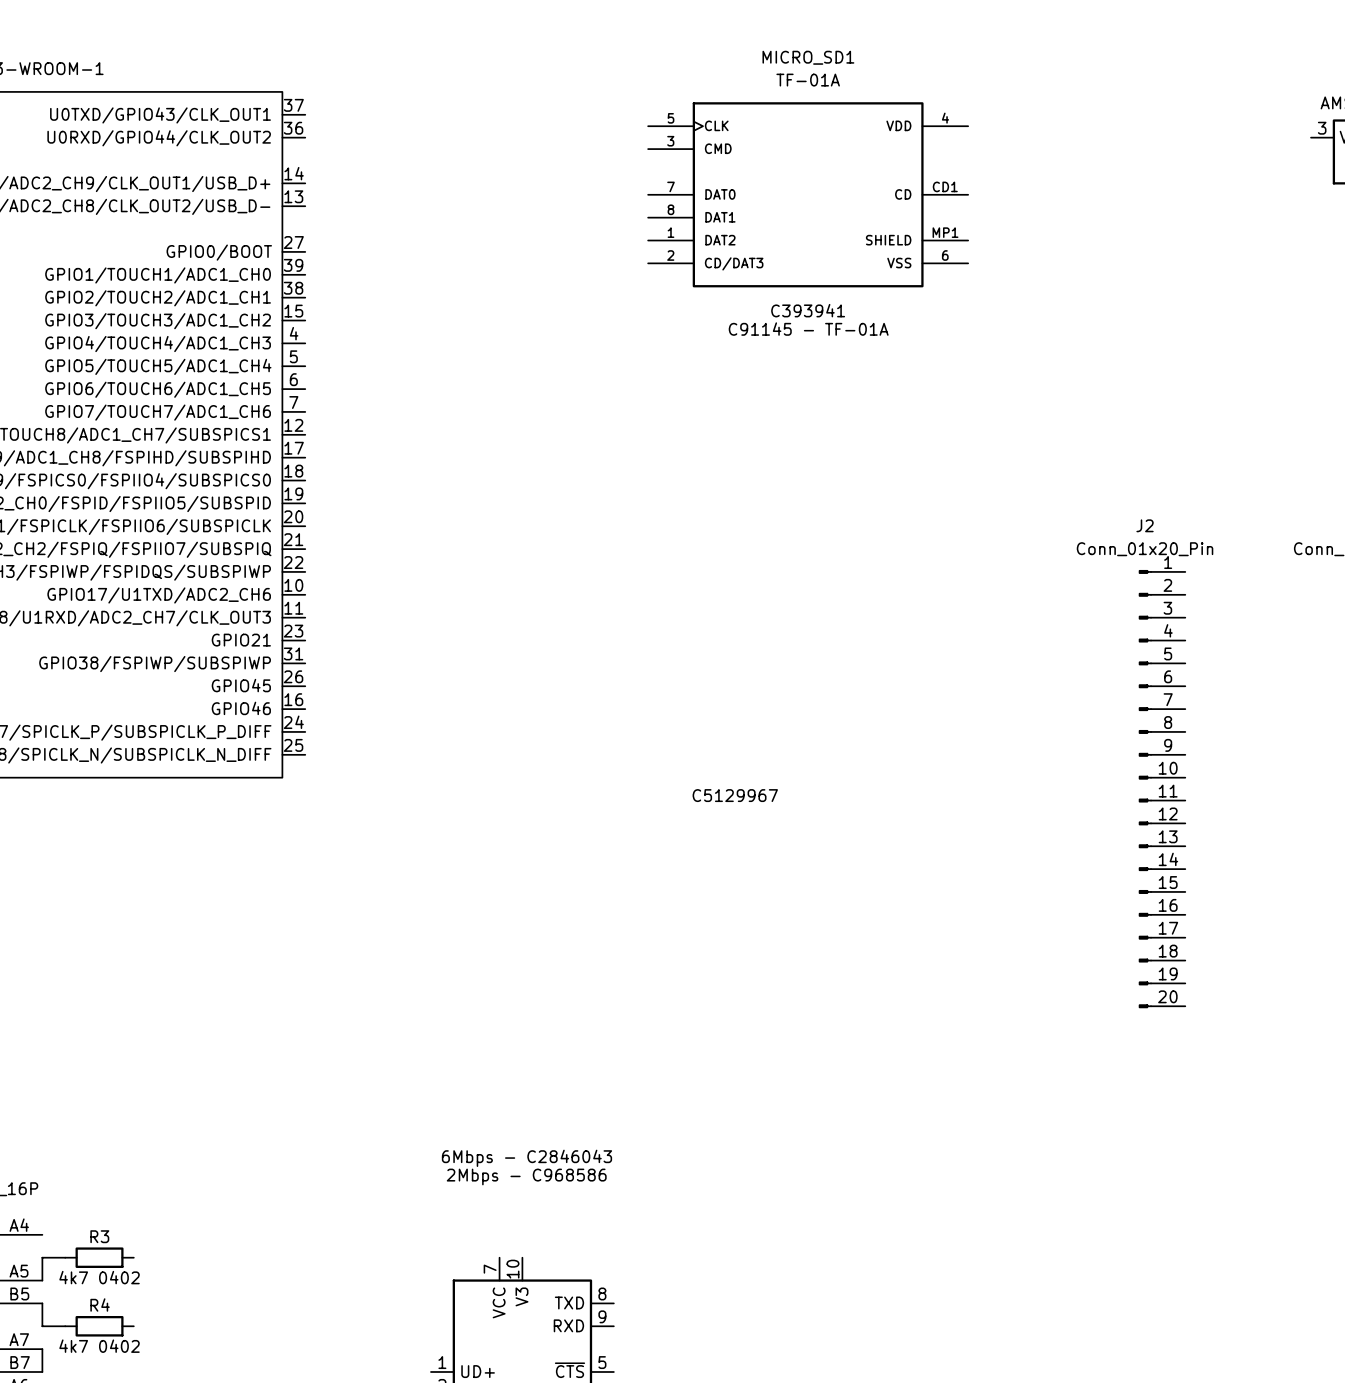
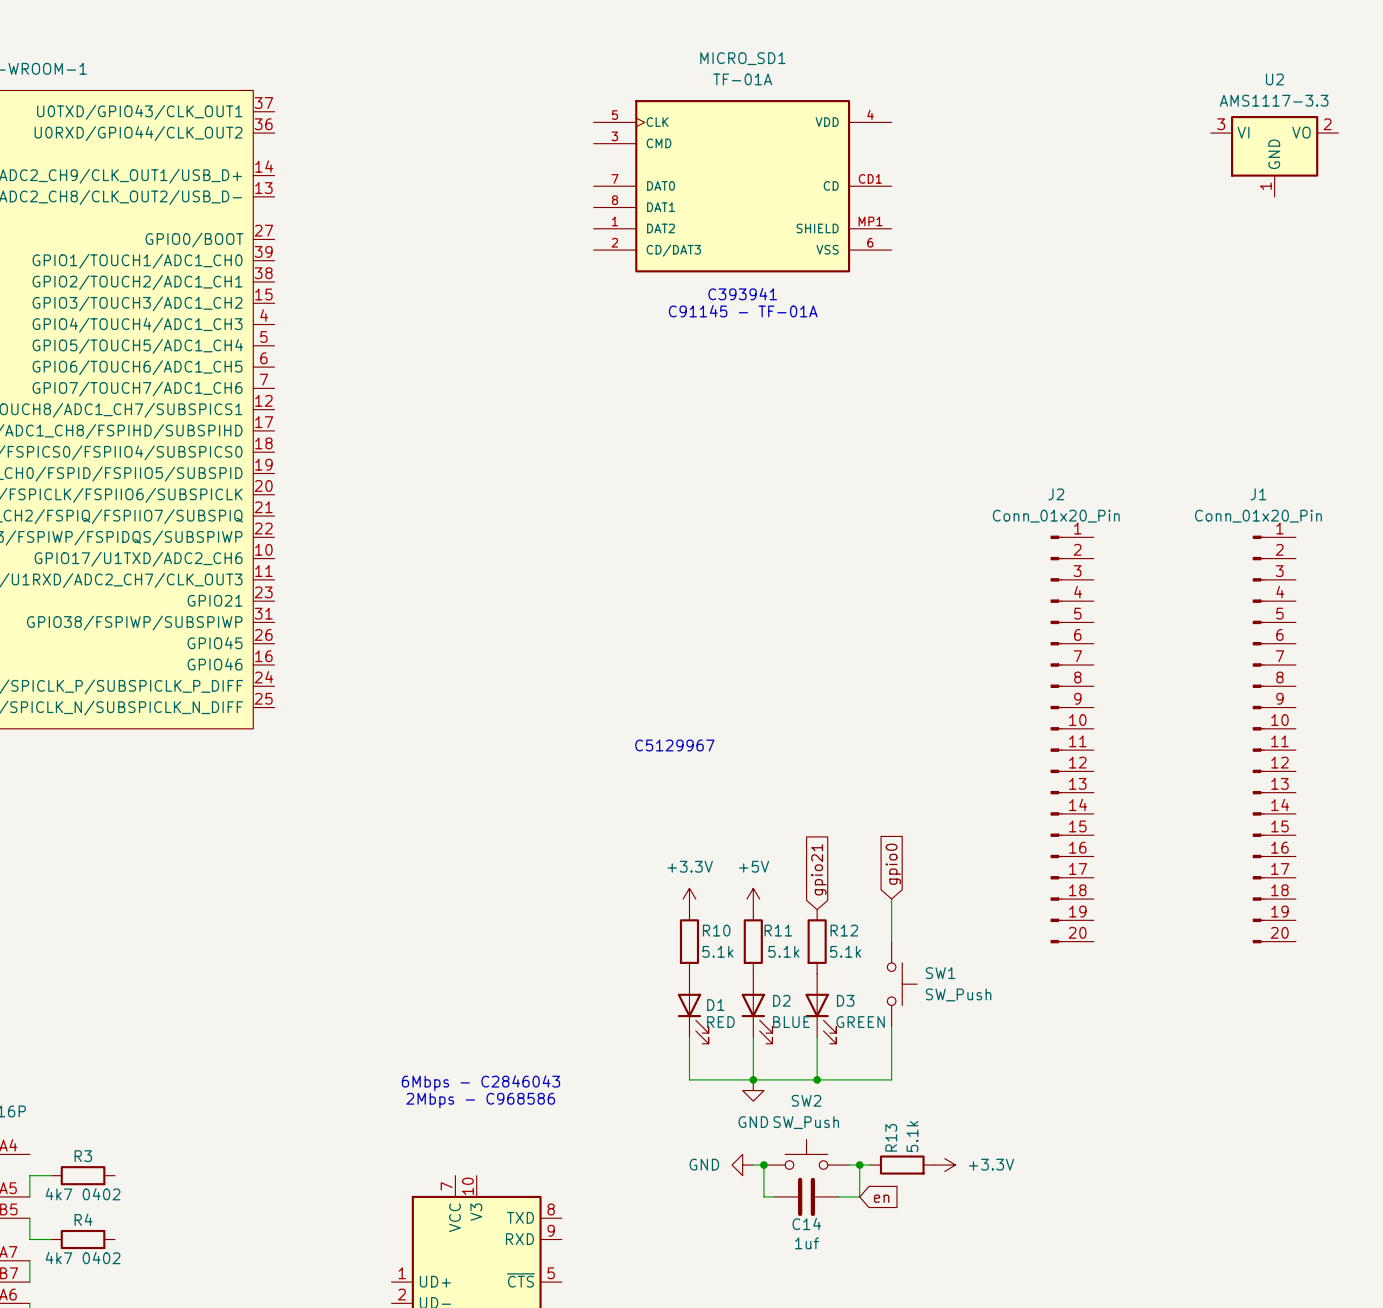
global label: none -> gpio0 (893, 864)
global label: none -> gpio21 (818, 869)
power symbol: none -> +3.3V (689, 899)
power symbol: none -> +5V (753, 899)
wire: none -> (891, 899) (891, 941)
R10: none -> 5.1k (689, 941)
R11: none -> 5.1k (753, 941)
R12: none -> 5.1k (817, 941)
SW1: none -> SW_Push (902, 984)
D1: none -> RED (693, 1008)
D2: none -> BLUE (757, 1008)
D3: none -> GREEN (820, 1008)
wire: none -> (891, 1026) (891, 1079) (689, 1079) (689, 1037)
wire: none -> (753, 1037) (753, 1079)
wire: none -> (817, 1037) (817, 1079)
junction: none -> (753, 1079)
junction: none -> (817, 1079)
power symbol: none -> GND (753, 1090)
SW2: none -> SW_Push (806, 1154)
power symbol: none -> GND (742, 1165)
wire: none -> (753, 1165) (763, 1165) (763, 1196) (774, 1196)
junction: none -> (763, 1165)
wire: none -> (849, 1165) (870, 1165)
wire: none -> (859, 1165) (859, 1196) (838, 1196)
junction: none -> (859, 1165)
R13: none -> 5.1k (902, 1165)
power symbol: none -> +3.3V (944, 1165)
C14: none -> 1uf (806, 1196)
global label: none -> en (881, 1198)

